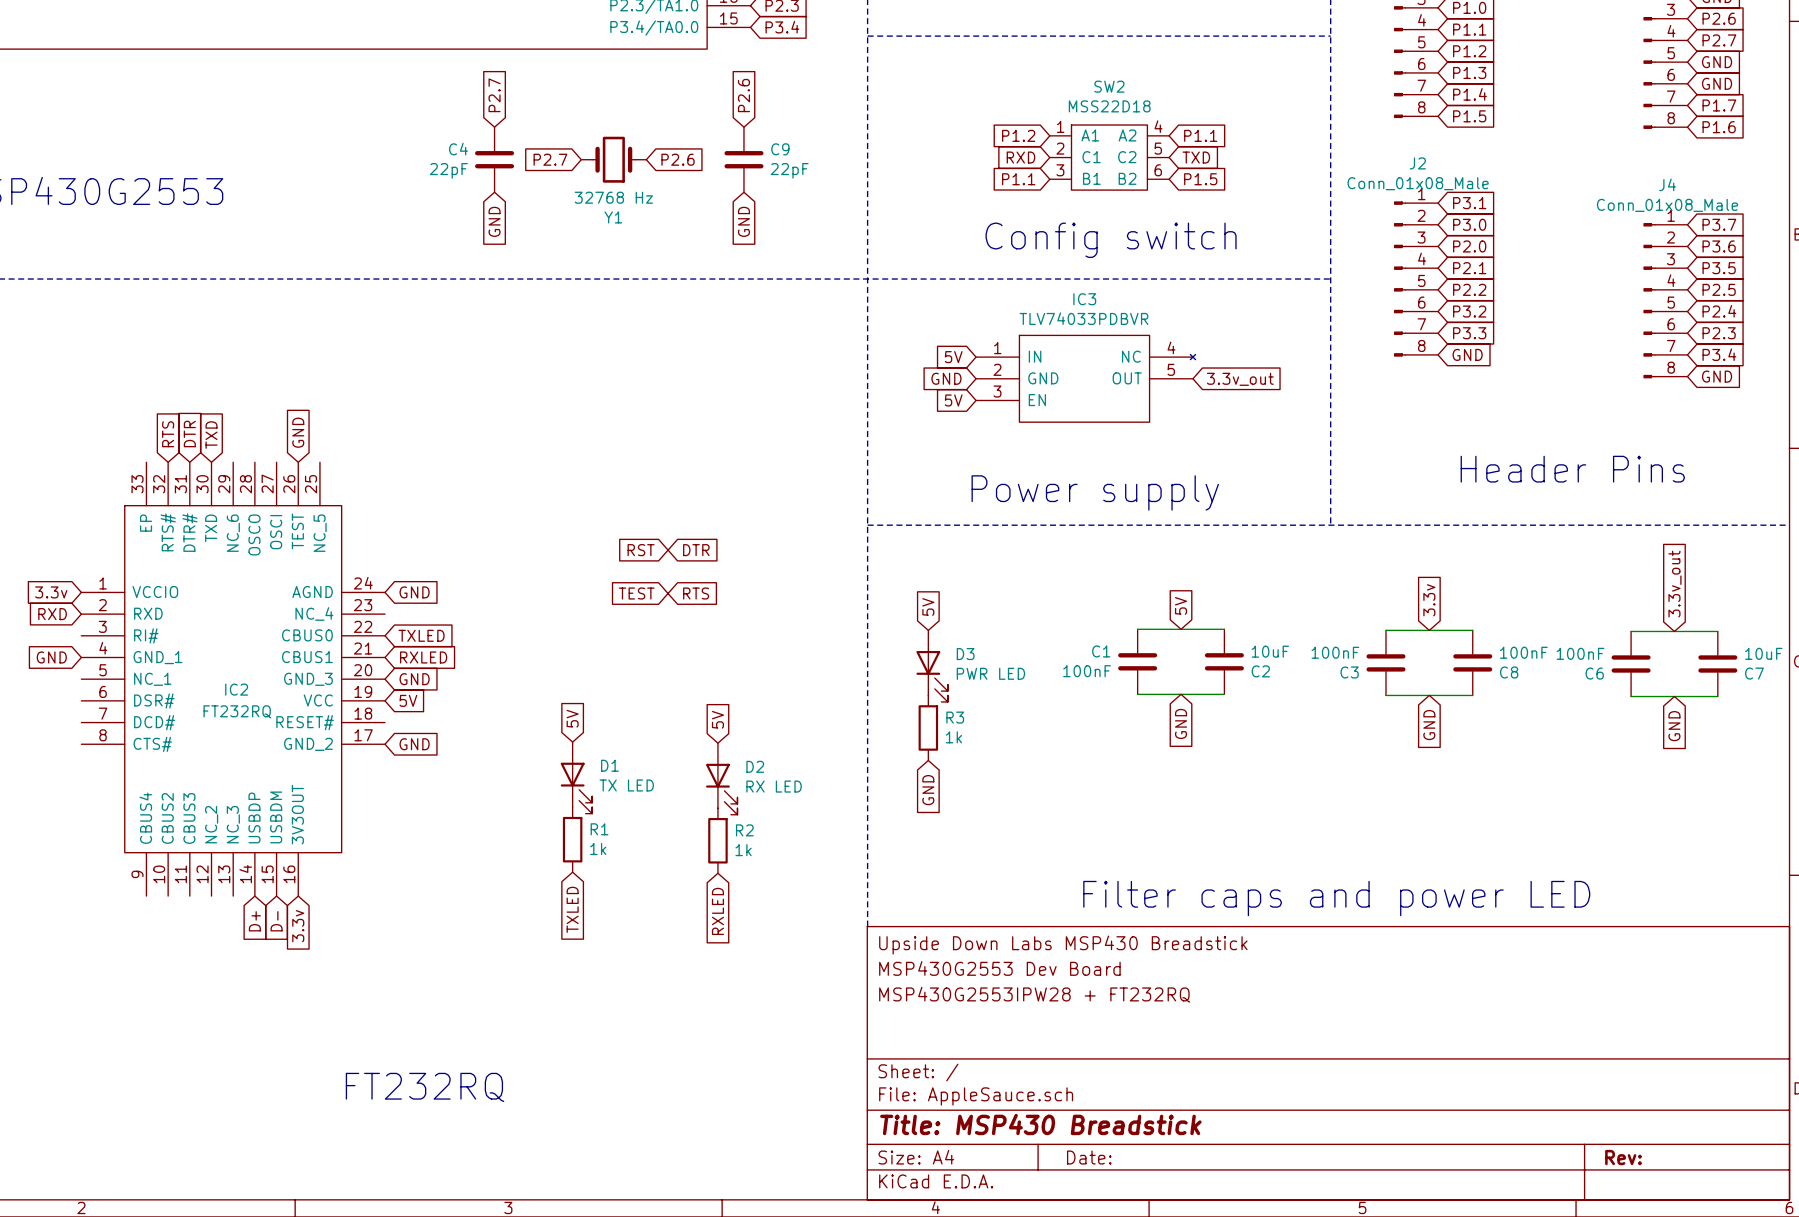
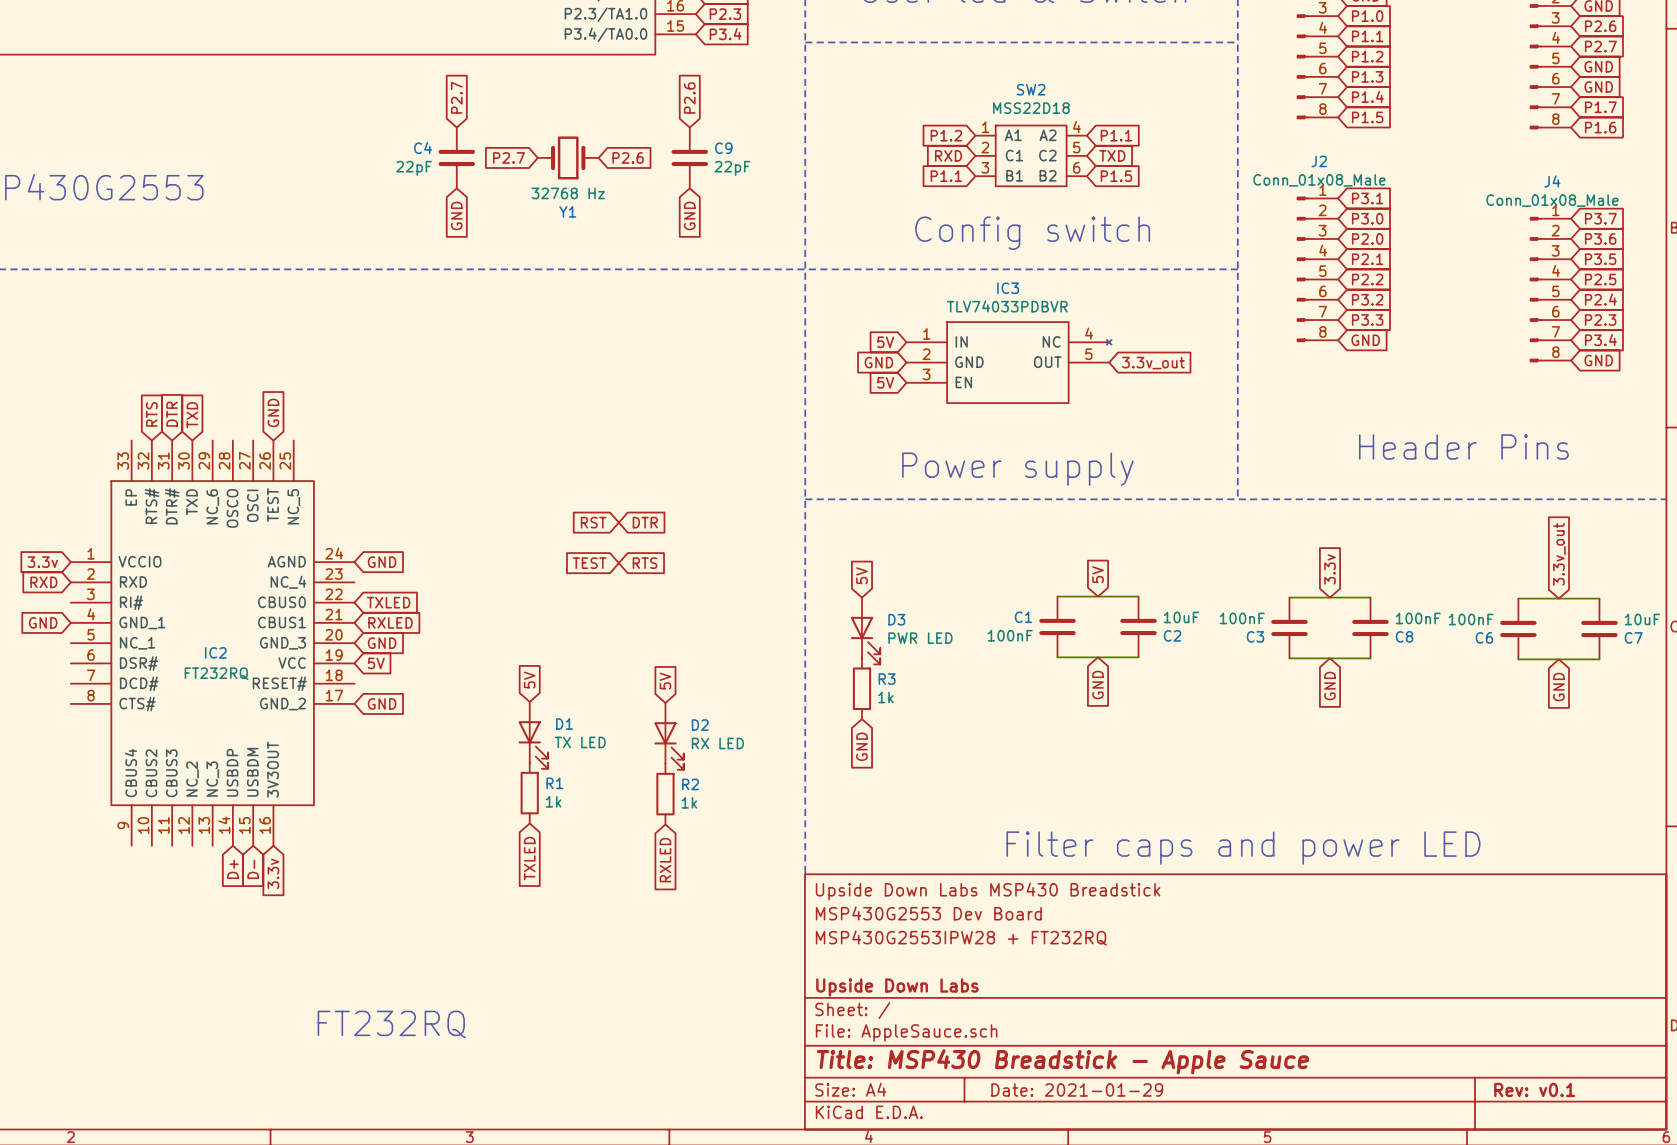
title block: none -> Upside Down Labs (897, 987)
title block: Title: MSP430 Breadstick (1040, 1124) -> Title: MSP430 Breadstick - Apple Sauce (1063, 1061)
title block: Date: (1089, 1157) -> Date: 2021-01-29 (1077, 1089)
title block: Rev: (1623, 1157) -> Rev: v0.1 (1534, 1089)

